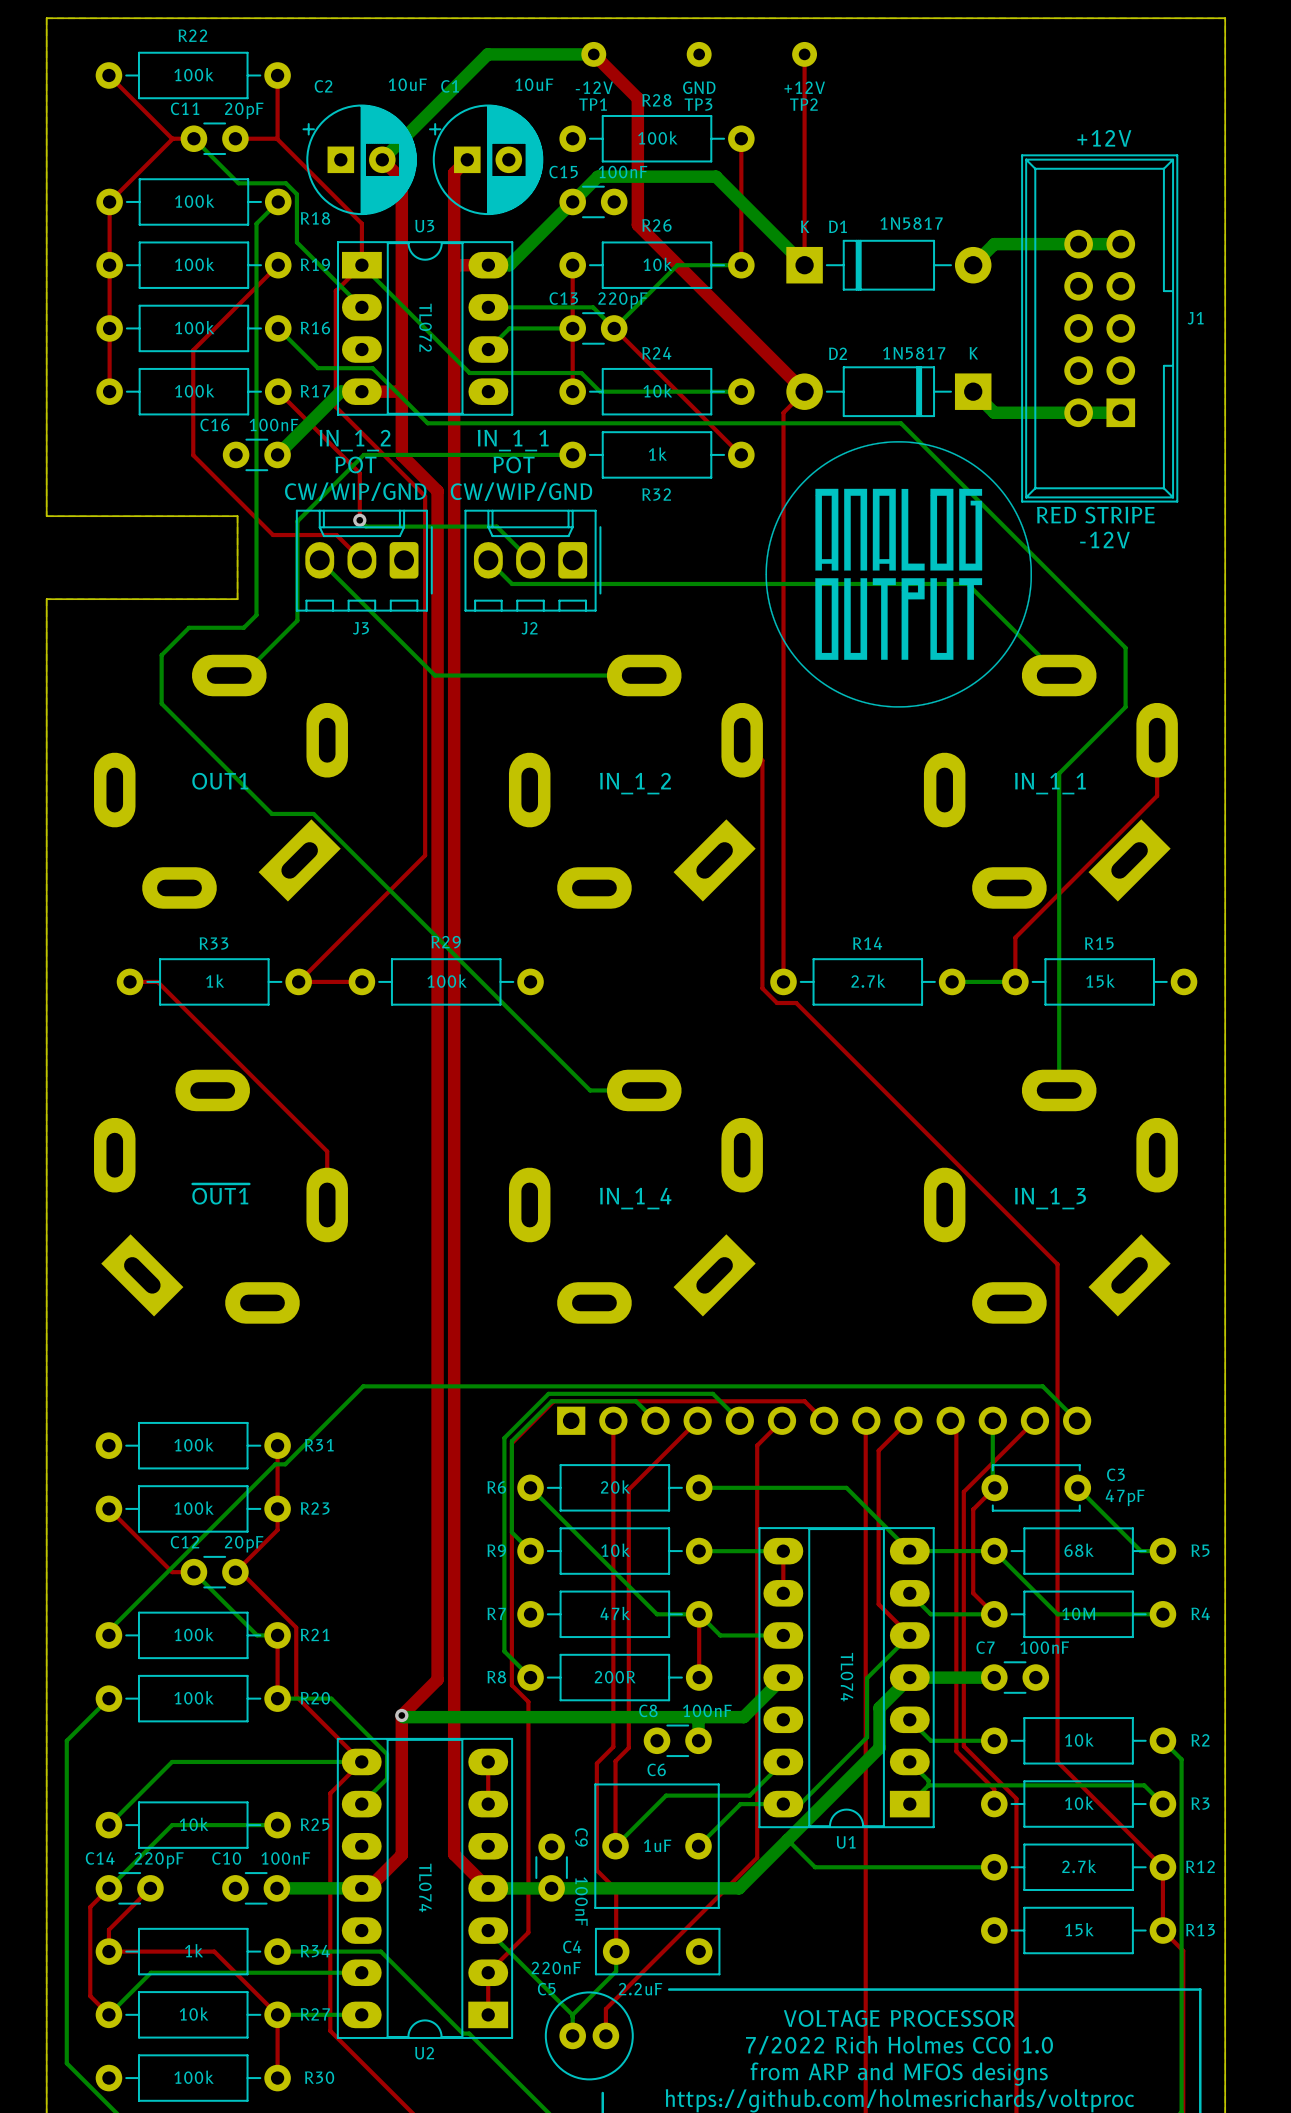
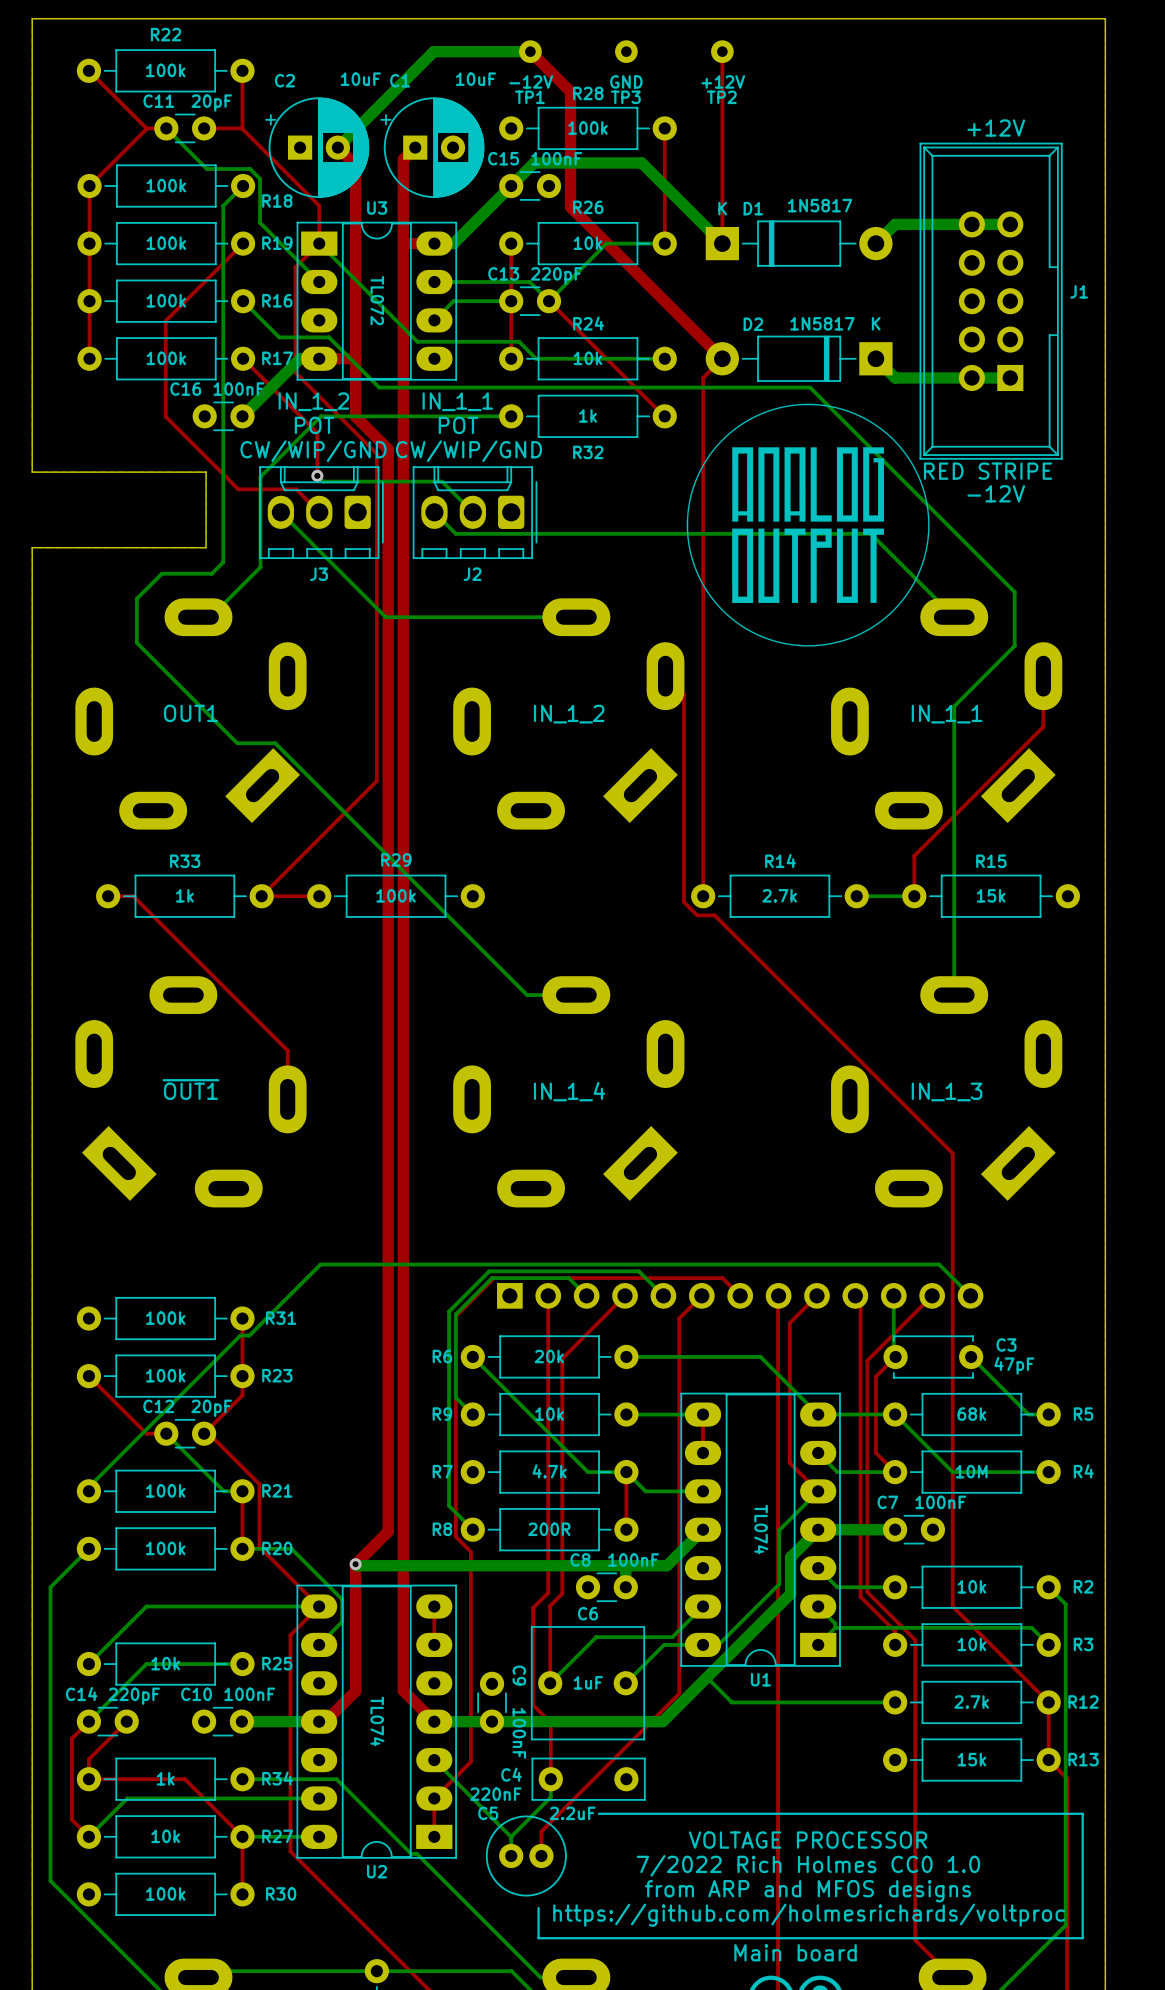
R7 value: 47k (615, 1613) -> 4.7k (549, 1471)

